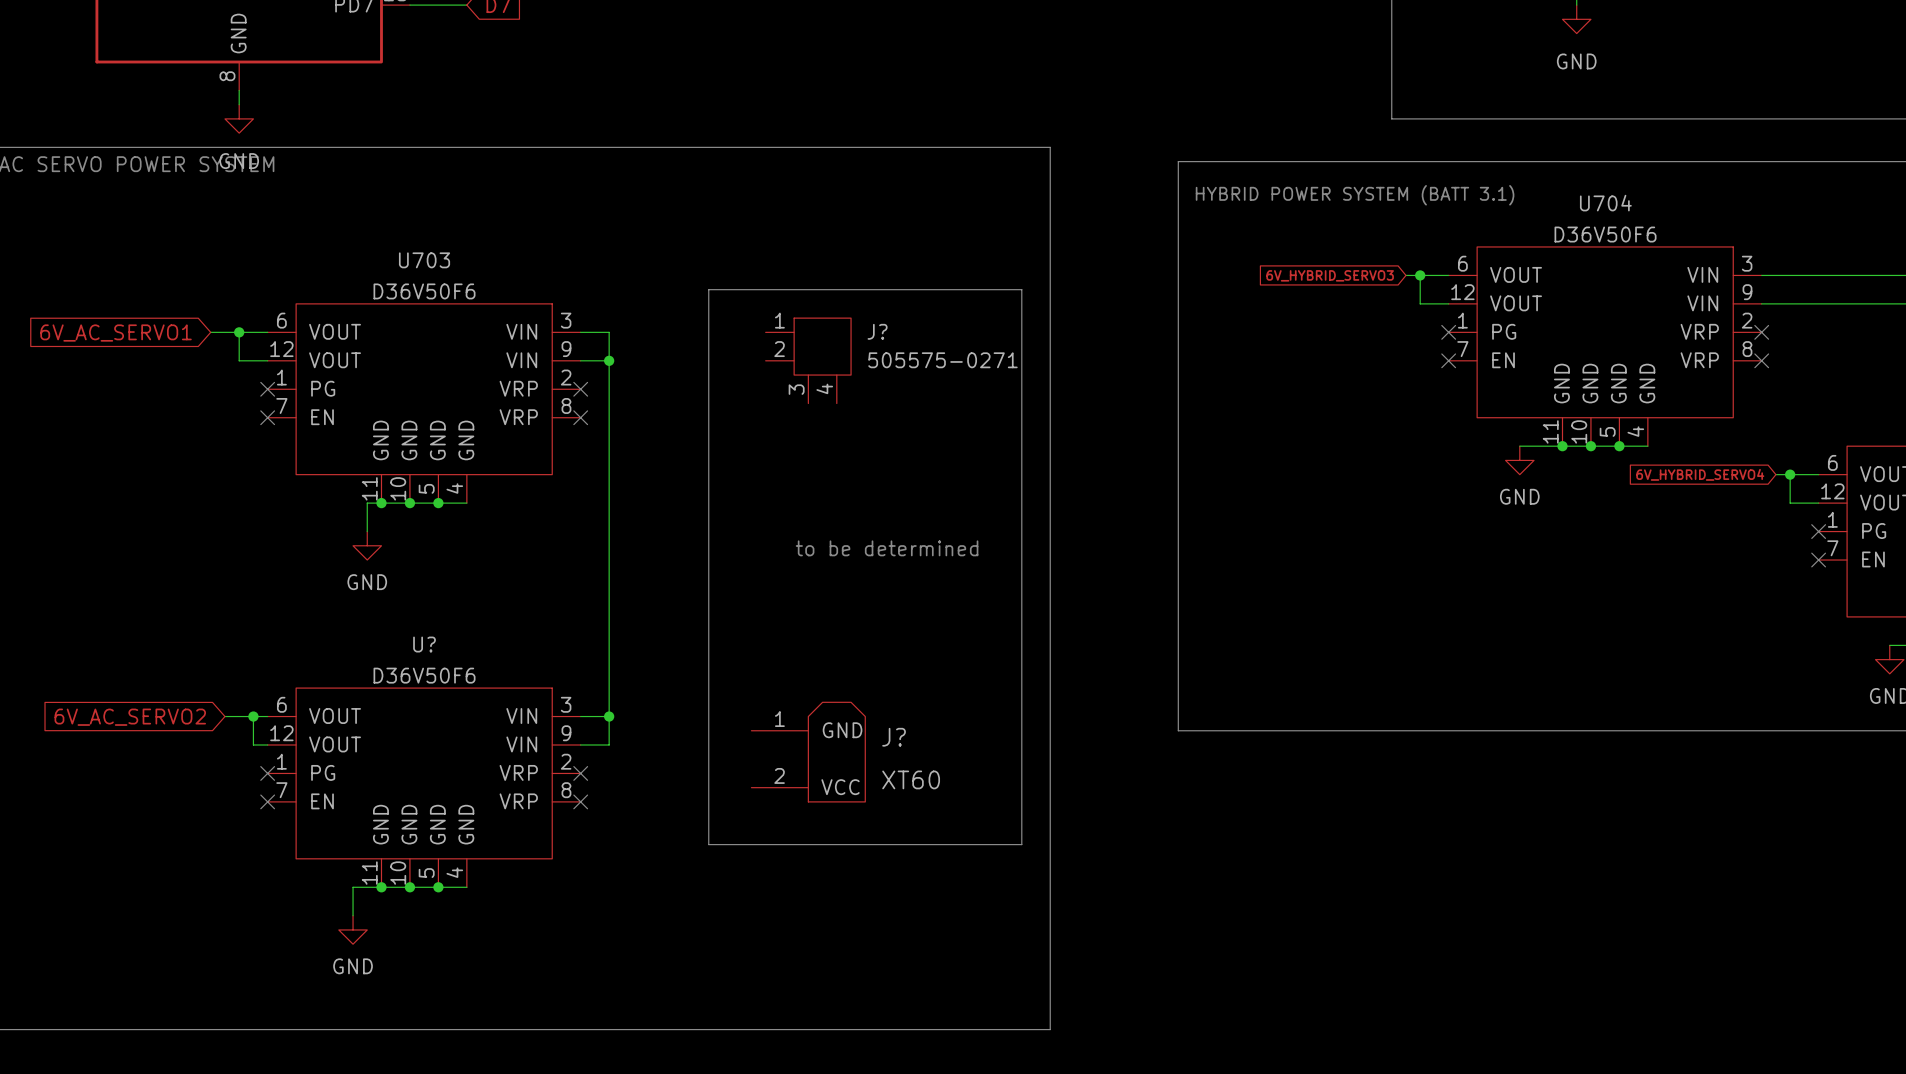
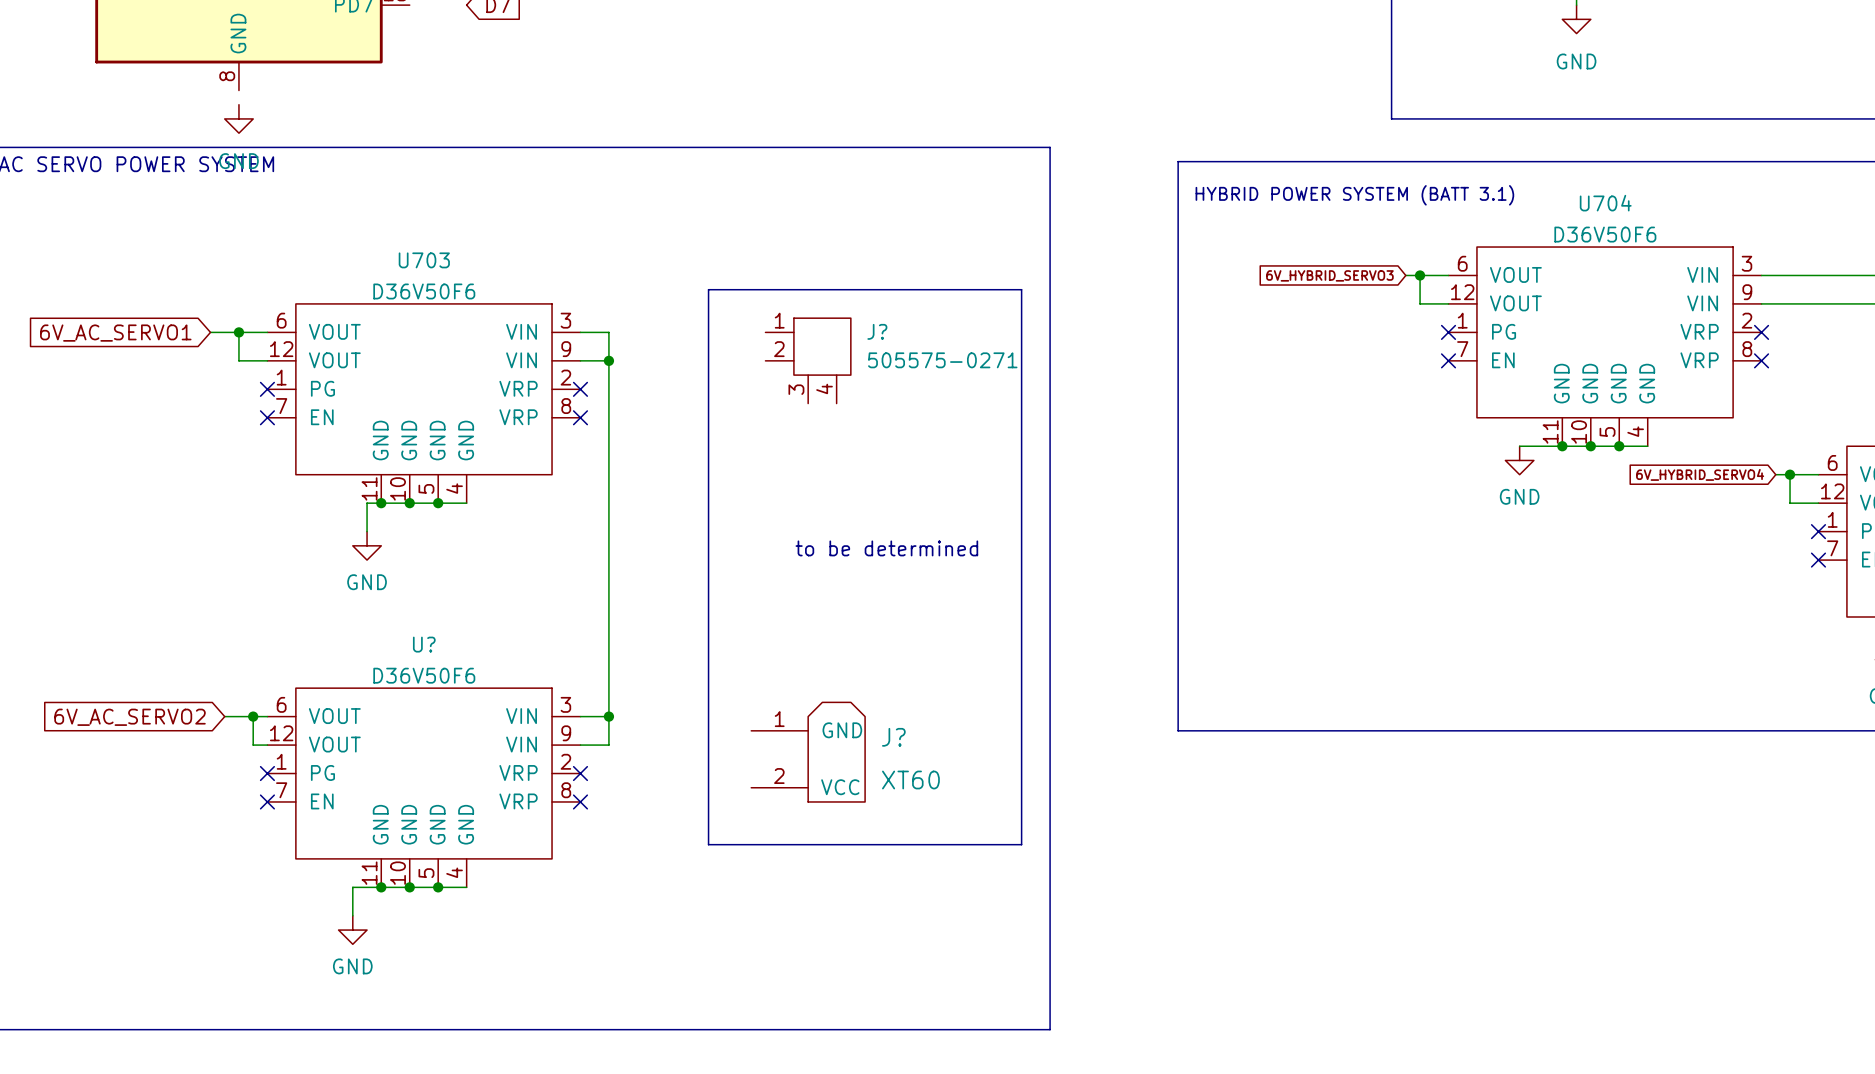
wire: (409, 5) (466, 5) -> none
wire: (239, 90) (239, 104) -> none

